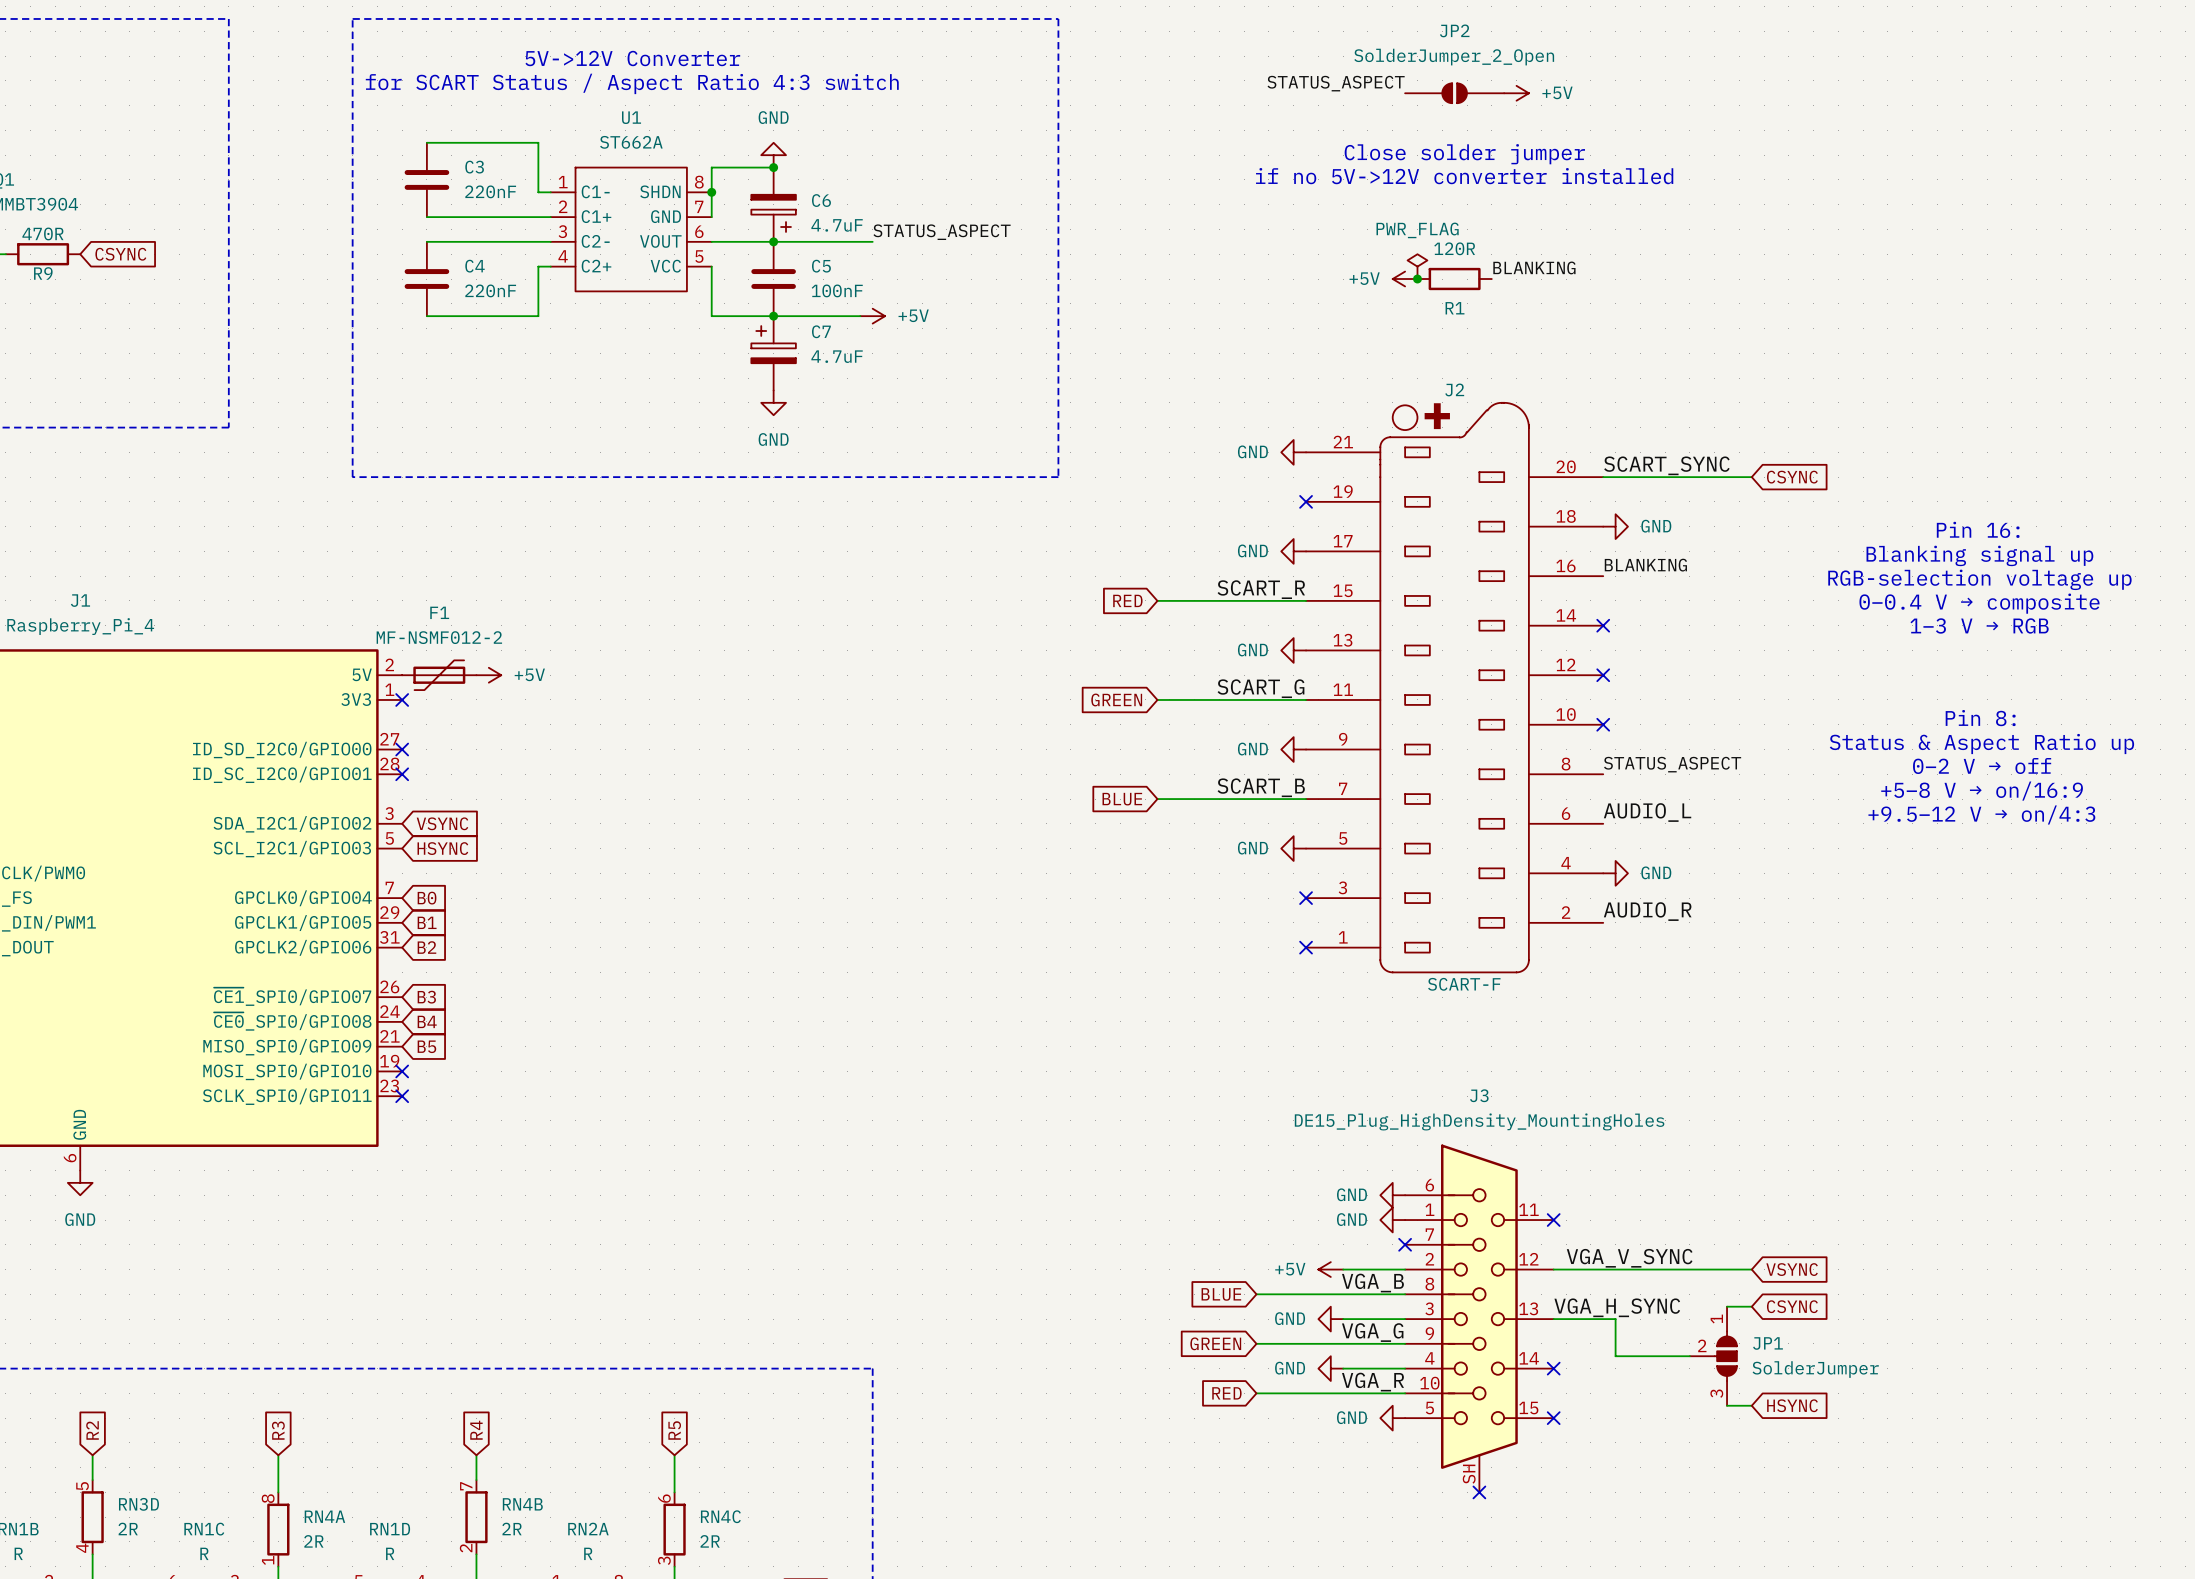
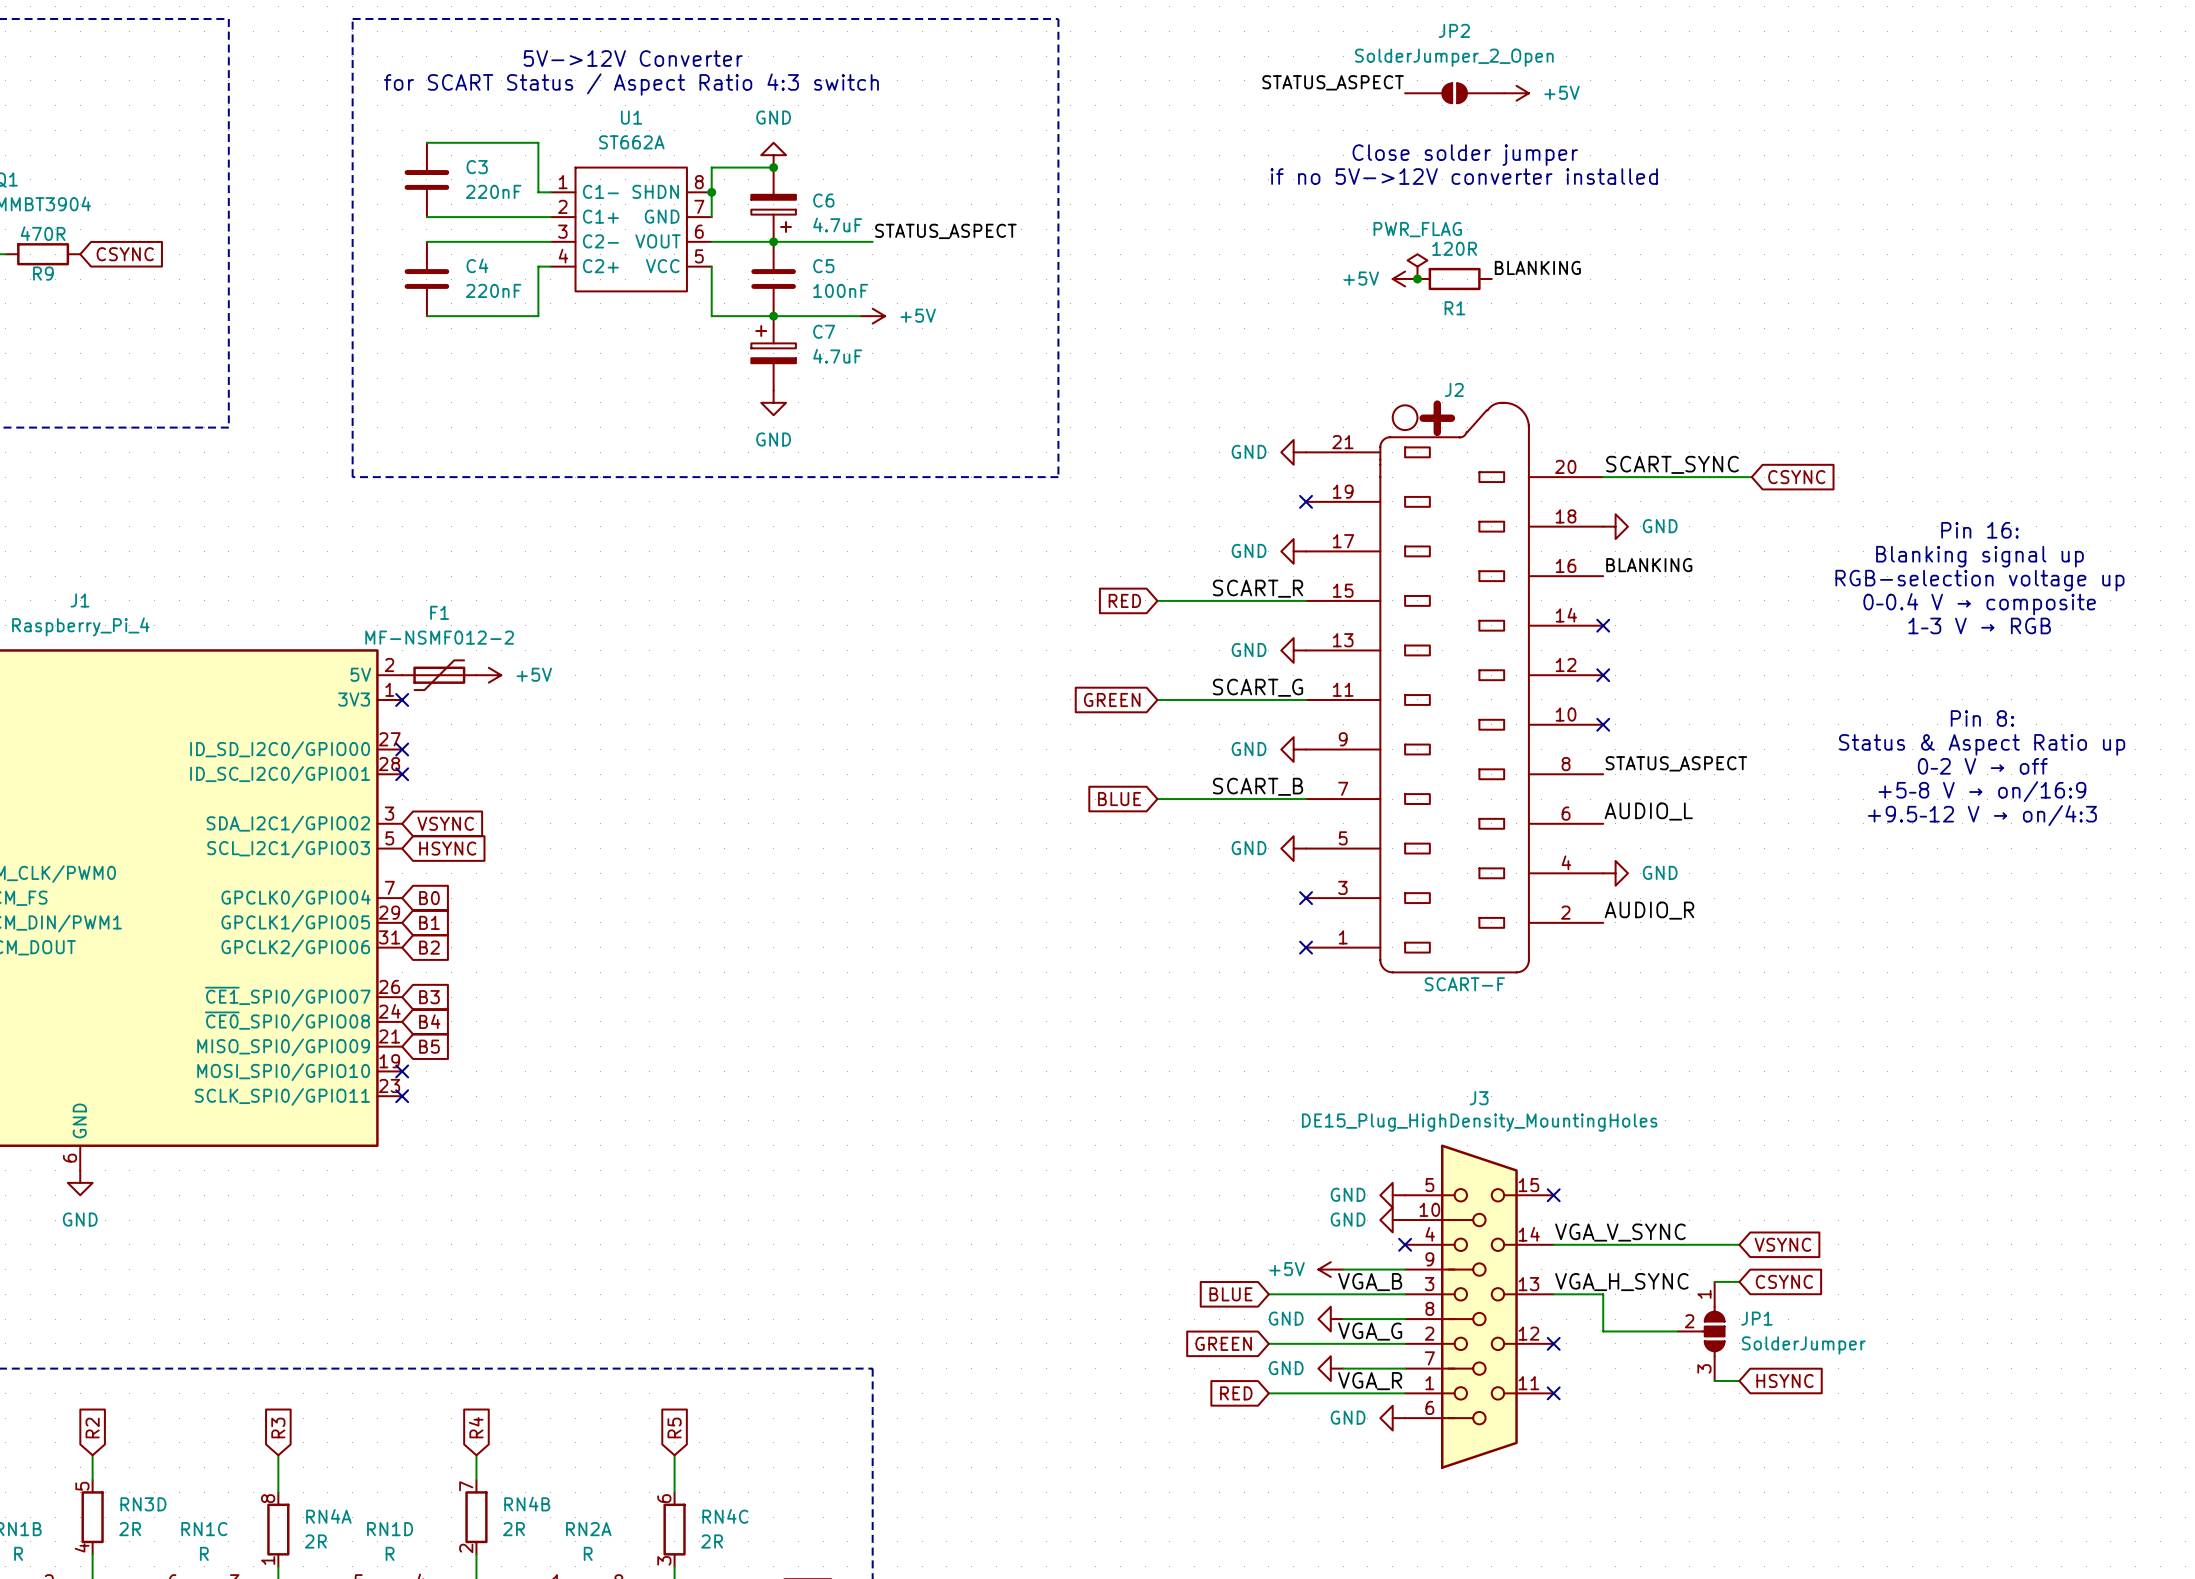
J3 symbol: [1405, 1144, 1554, 1493] -> [1405, 1144, 1554, 1469]
no-connect mark position: (1553, 1220) -> (1553, 1195)
wire: none -> (1553, 1244) (1739, 1244)
label position: VGA_V_SYNC (1629, 1258) -> VGA_V_SYNC (1620, 1232)
wire: (1553, 1269) (1751, 1269) -> none
global label position: VSYNC (1792, 1269) -> VSYNC (1782, 1244)
global label position: BLUE (1221, 1294) -> BLUE (1231, 1294)
wire: (1256, 1294) (1268, 1294) -> none
wire: none -> (1553, 1294) (1603, 1294) (1603, 1331) (1677, 1331)
wire: (1727, 1306) (1751, 1306) -> (1714, 1281) (1739, 1281)
global label position: CSYNC (1792, 1306) -> CSYNC (1784, 1281)
label position: VGA_H_SYNC (1617, 1307) -> VGA_H_SYNC (1621, 1282)
wire: (1553, 1319) (1615, 1319) (1615, 1356) (1689, 1356) -> none
global label position: GREEN (1215, 1343) -> GREEN (1223, 1343)
wire: (1256, 1343) (1268, 1343) -> none
no-connect mark: none -> (1553, 1343)
JP1 position: (1713, 1356) -> (1701, 1331)
no-connect mark: (1553, 1368) -> none
global label position: RED (1226, 1393) -> RED (1236, 1393)
wire: (1256, 1393) (1268, 1393) -> none
no-connect mark: none -> (1553, 1393)
wire: (1727, 1405) (1751, 1405) -> (1714, 1380) (1739, 1380)
global label position: HSYNC (1792, 1405) -> HSYNC (1784, 1380)
no-connect mark: (1553, 1418) -> none
no-connect mark: (1479, 1492) -> none

